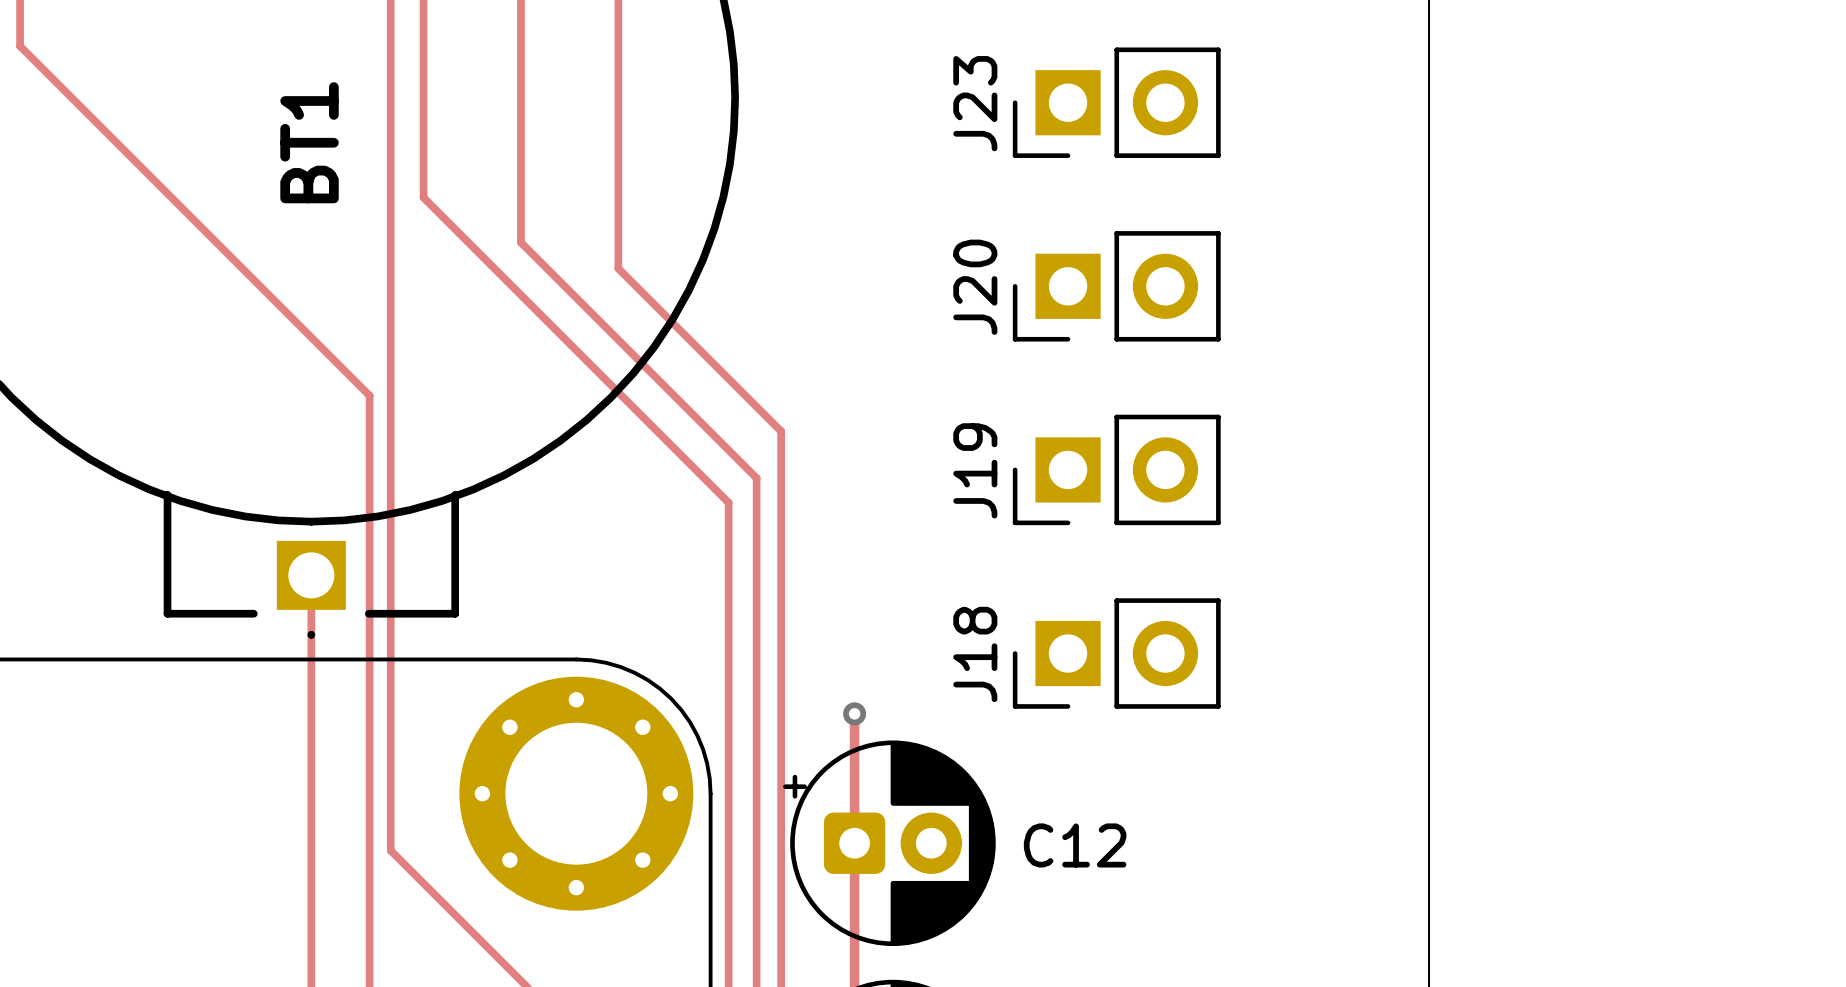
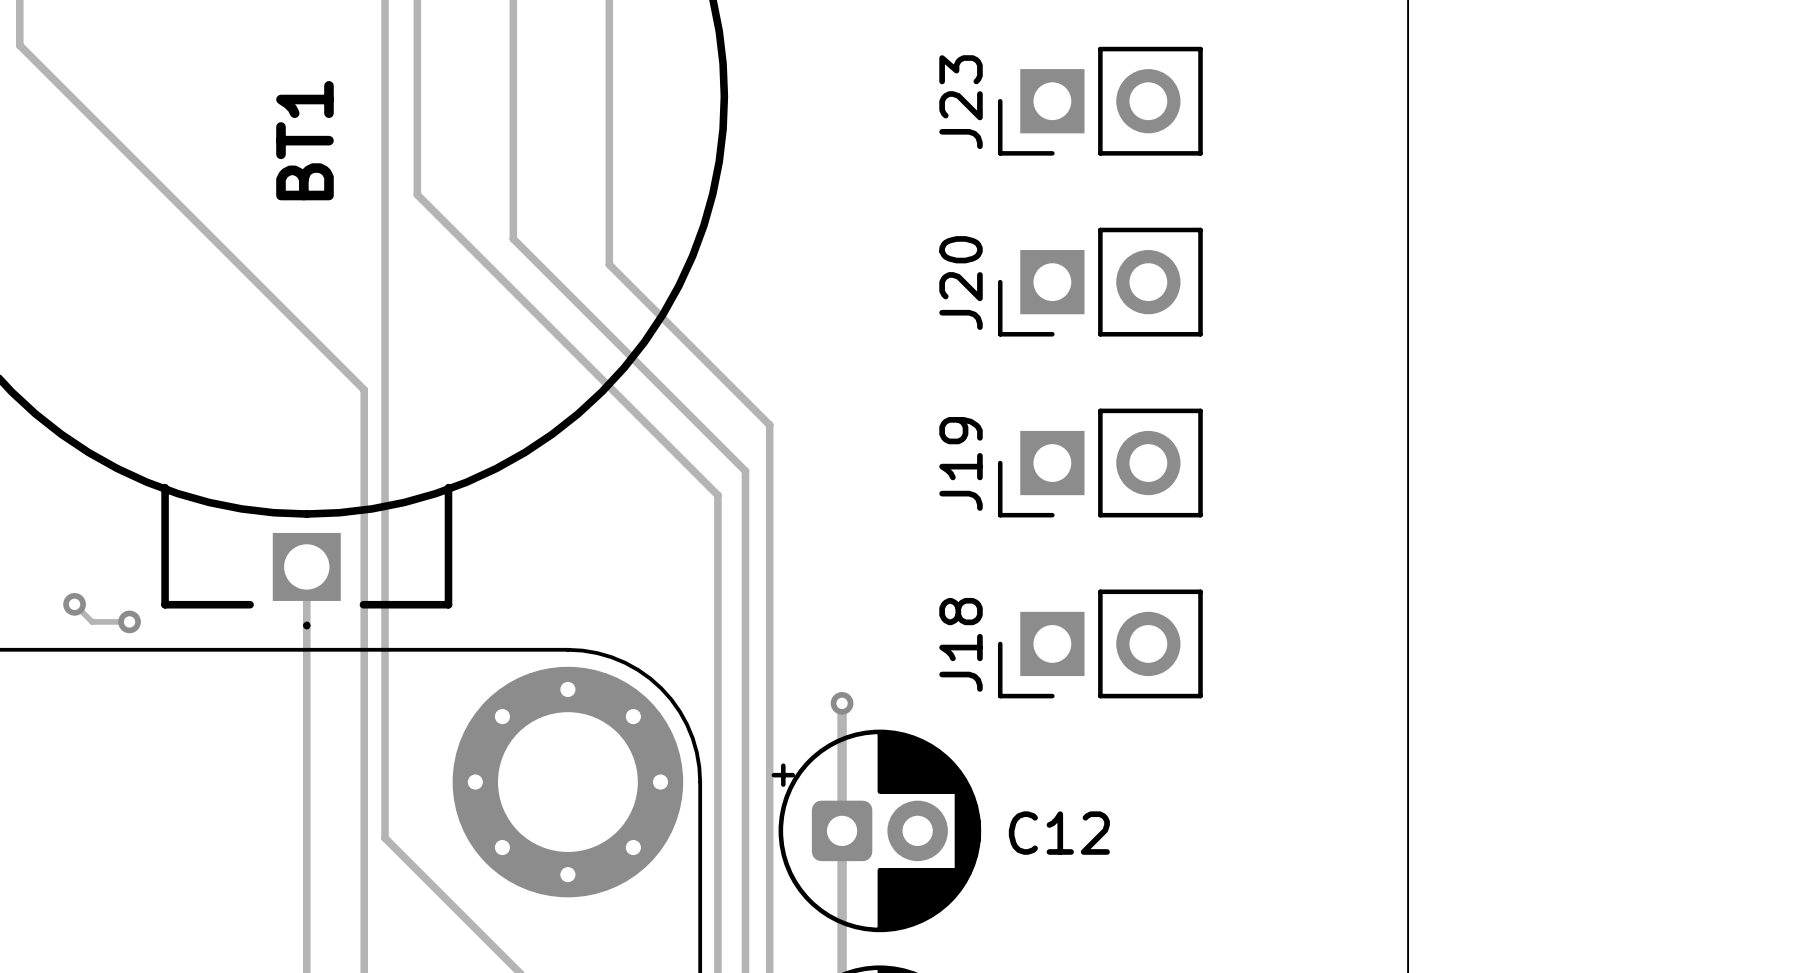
track: none -> (74, 604) (92, 621) (129, 621)
via: none -> (74, 604)
via: none -> (129, 621)

